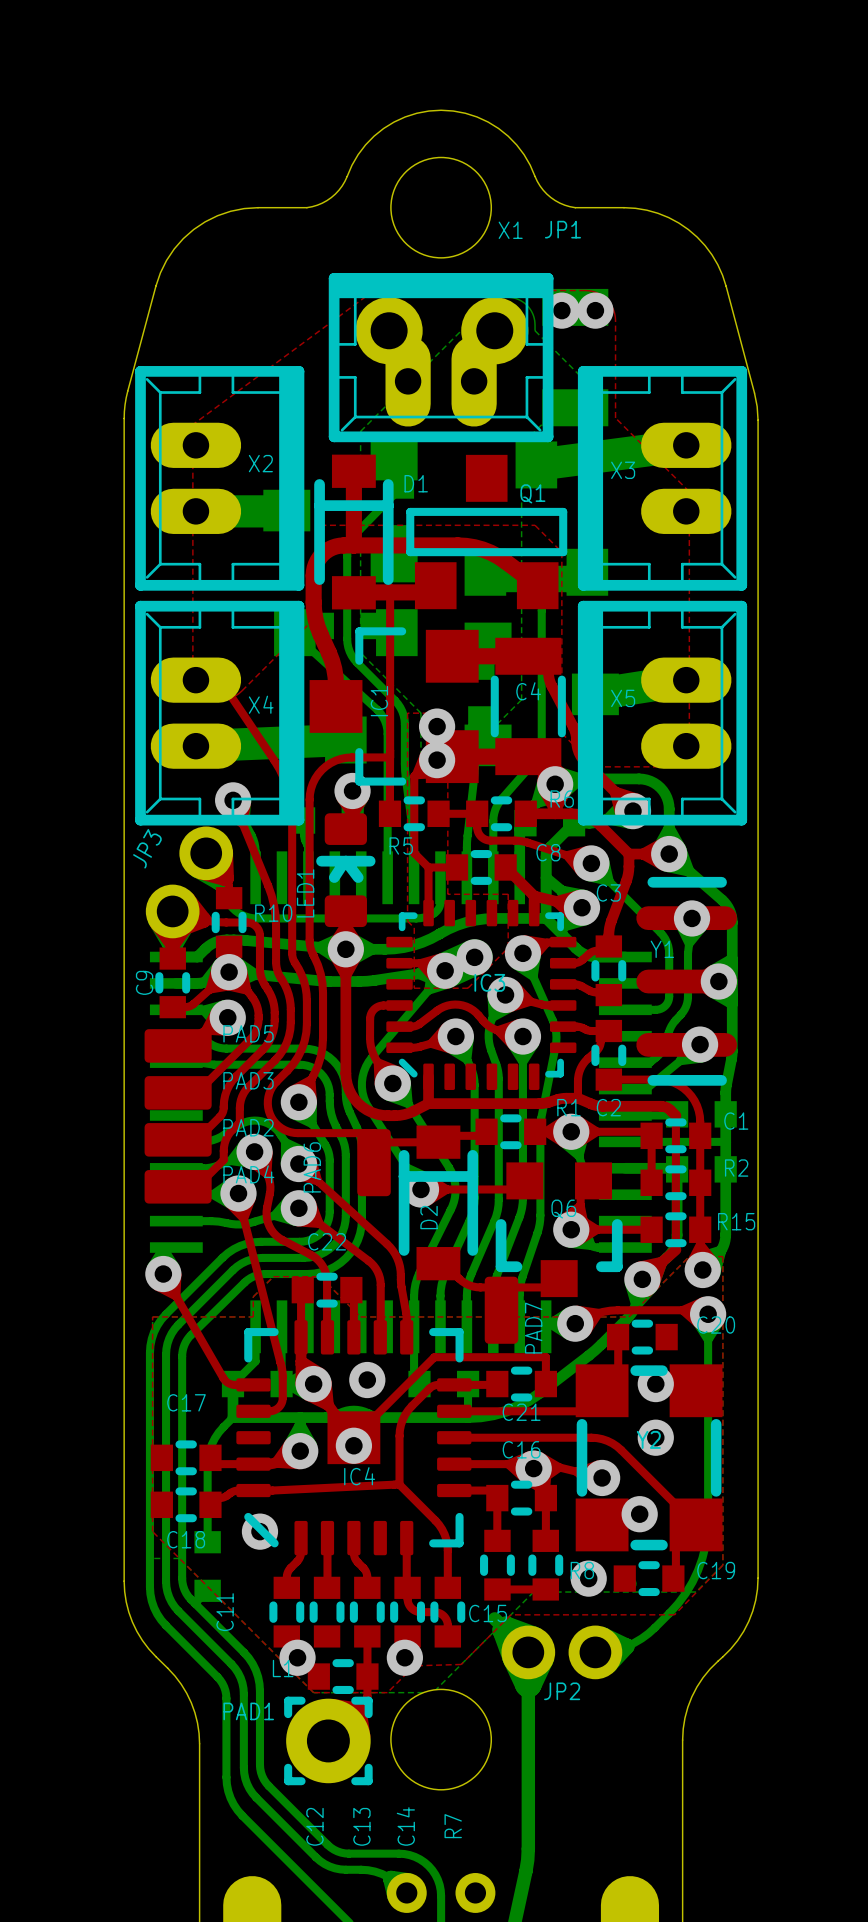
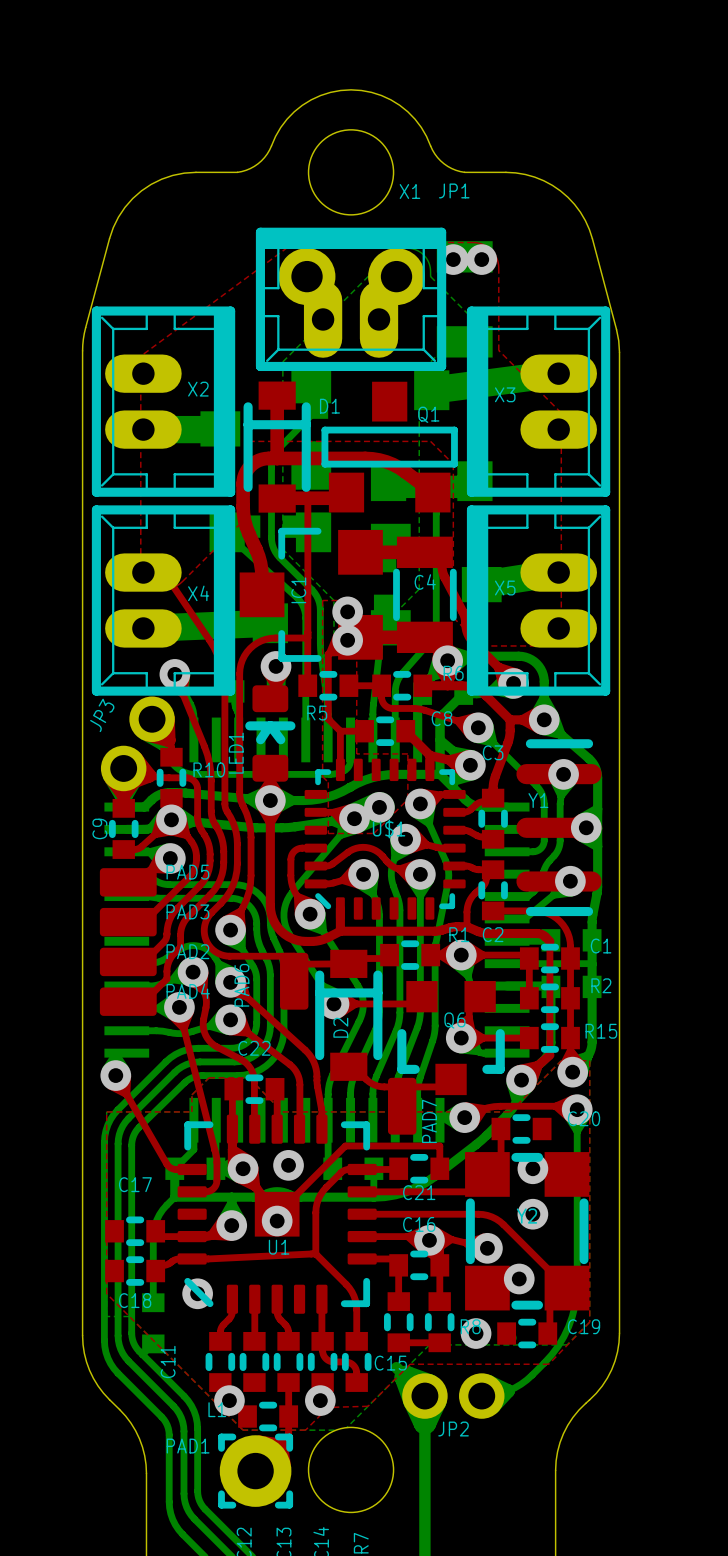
IC3 name: IC3 (489, 982) -> U$1 (389, 828)
IC4 name: IC4 (359, 1476) -> U1 (279, 1247)

